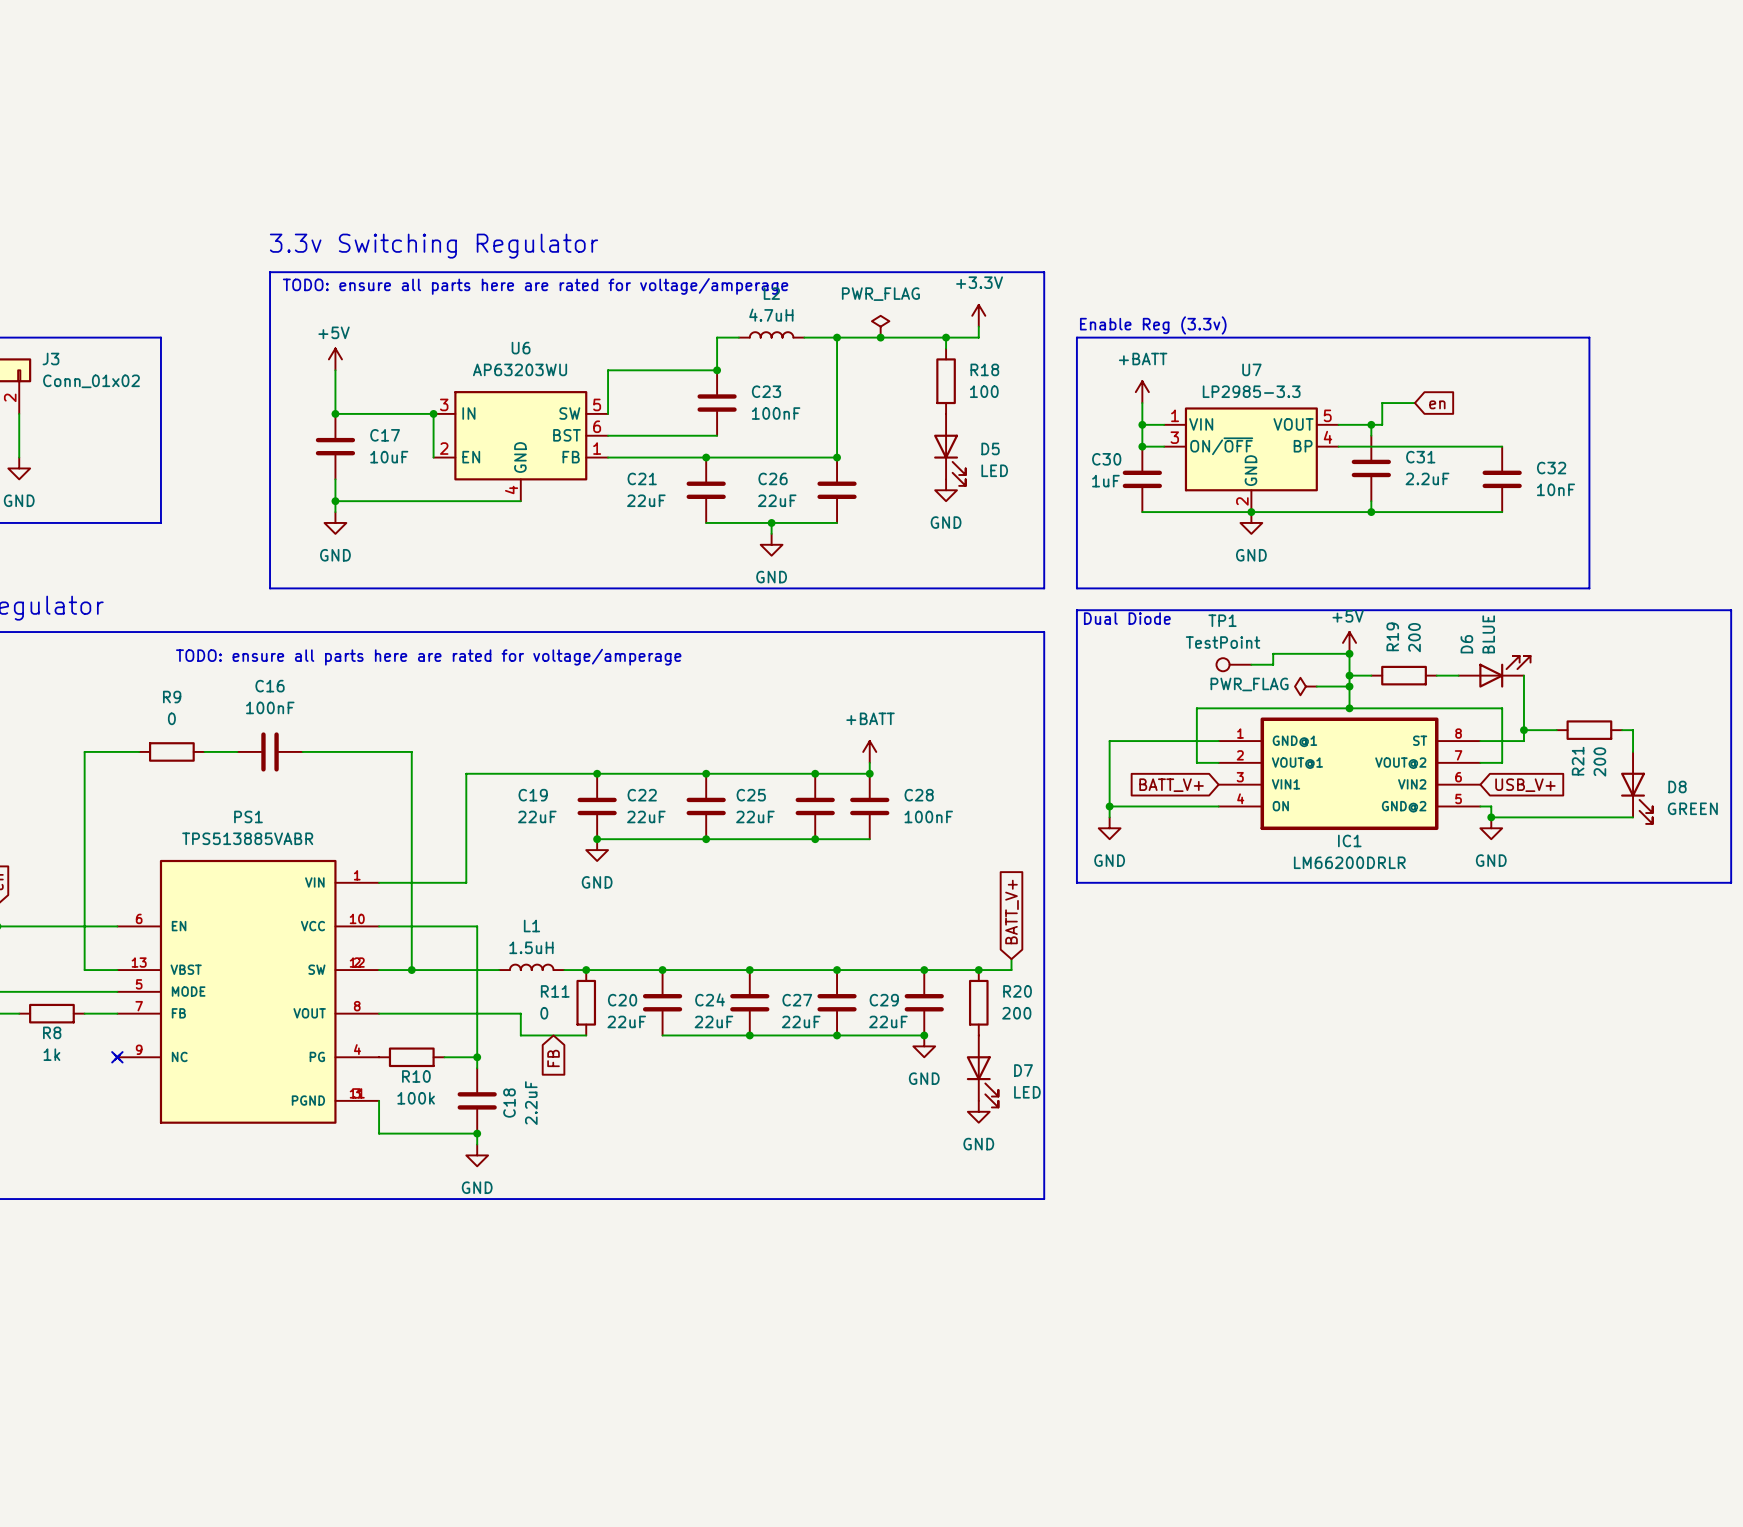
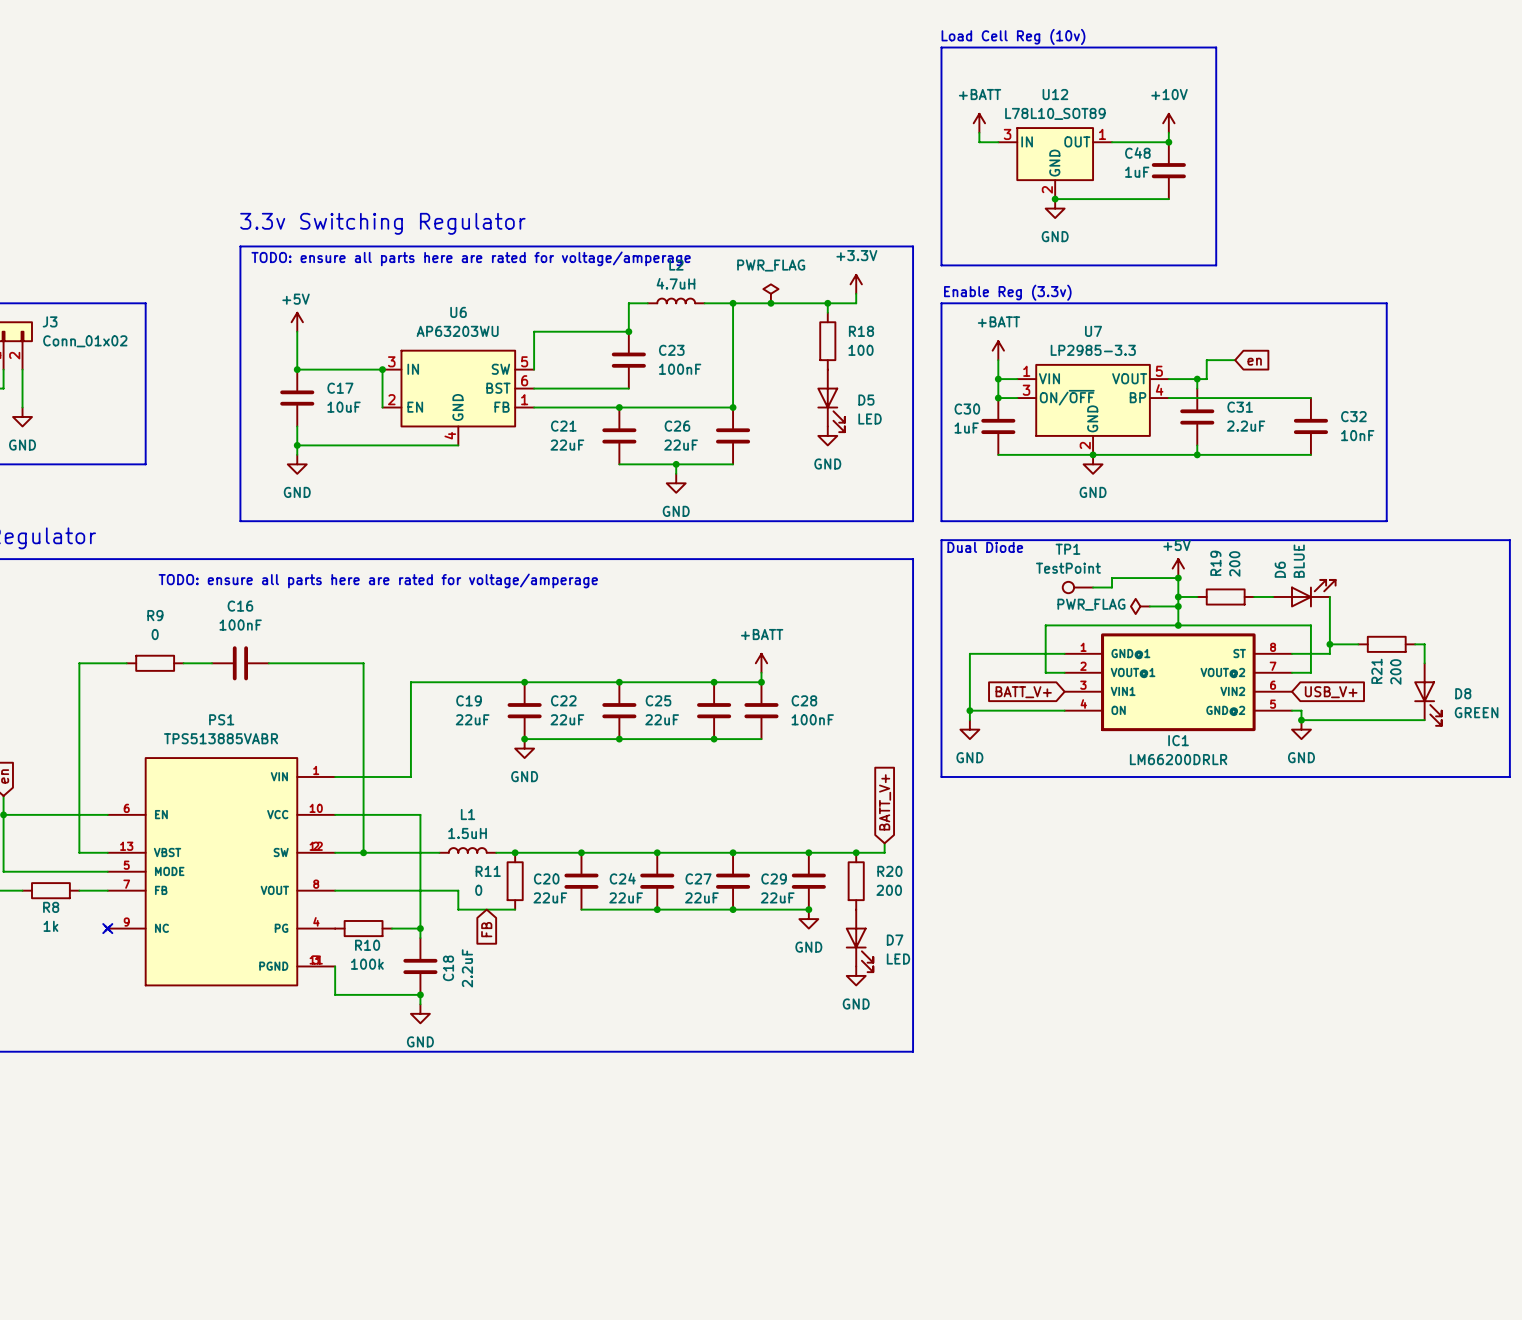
text: none -> Load Cell Reg (10v) (1013, 36)
line: none -> (941, 47) (1216, 47) (1216, 265) (941, 265) (941, 47)
power symbol: none -> +BATT (979, 123)
power symbol: none -> +10V (1168, 123)
wire: none -> (979, 132) (979, 142) (998, 142)
wire: none -> (1168, 132) (1168, 142) (1112, 142)
junction: none -> (1168, 142)
U12: none -> L78L10_SOT89 (1055, 163)
C48: none -> 1uF (1168, 170)
wire: none -> (1055, 199) (1168, 199)
junction: none -> (1055, 199)
power symbol: none -> GND (1055, 208)

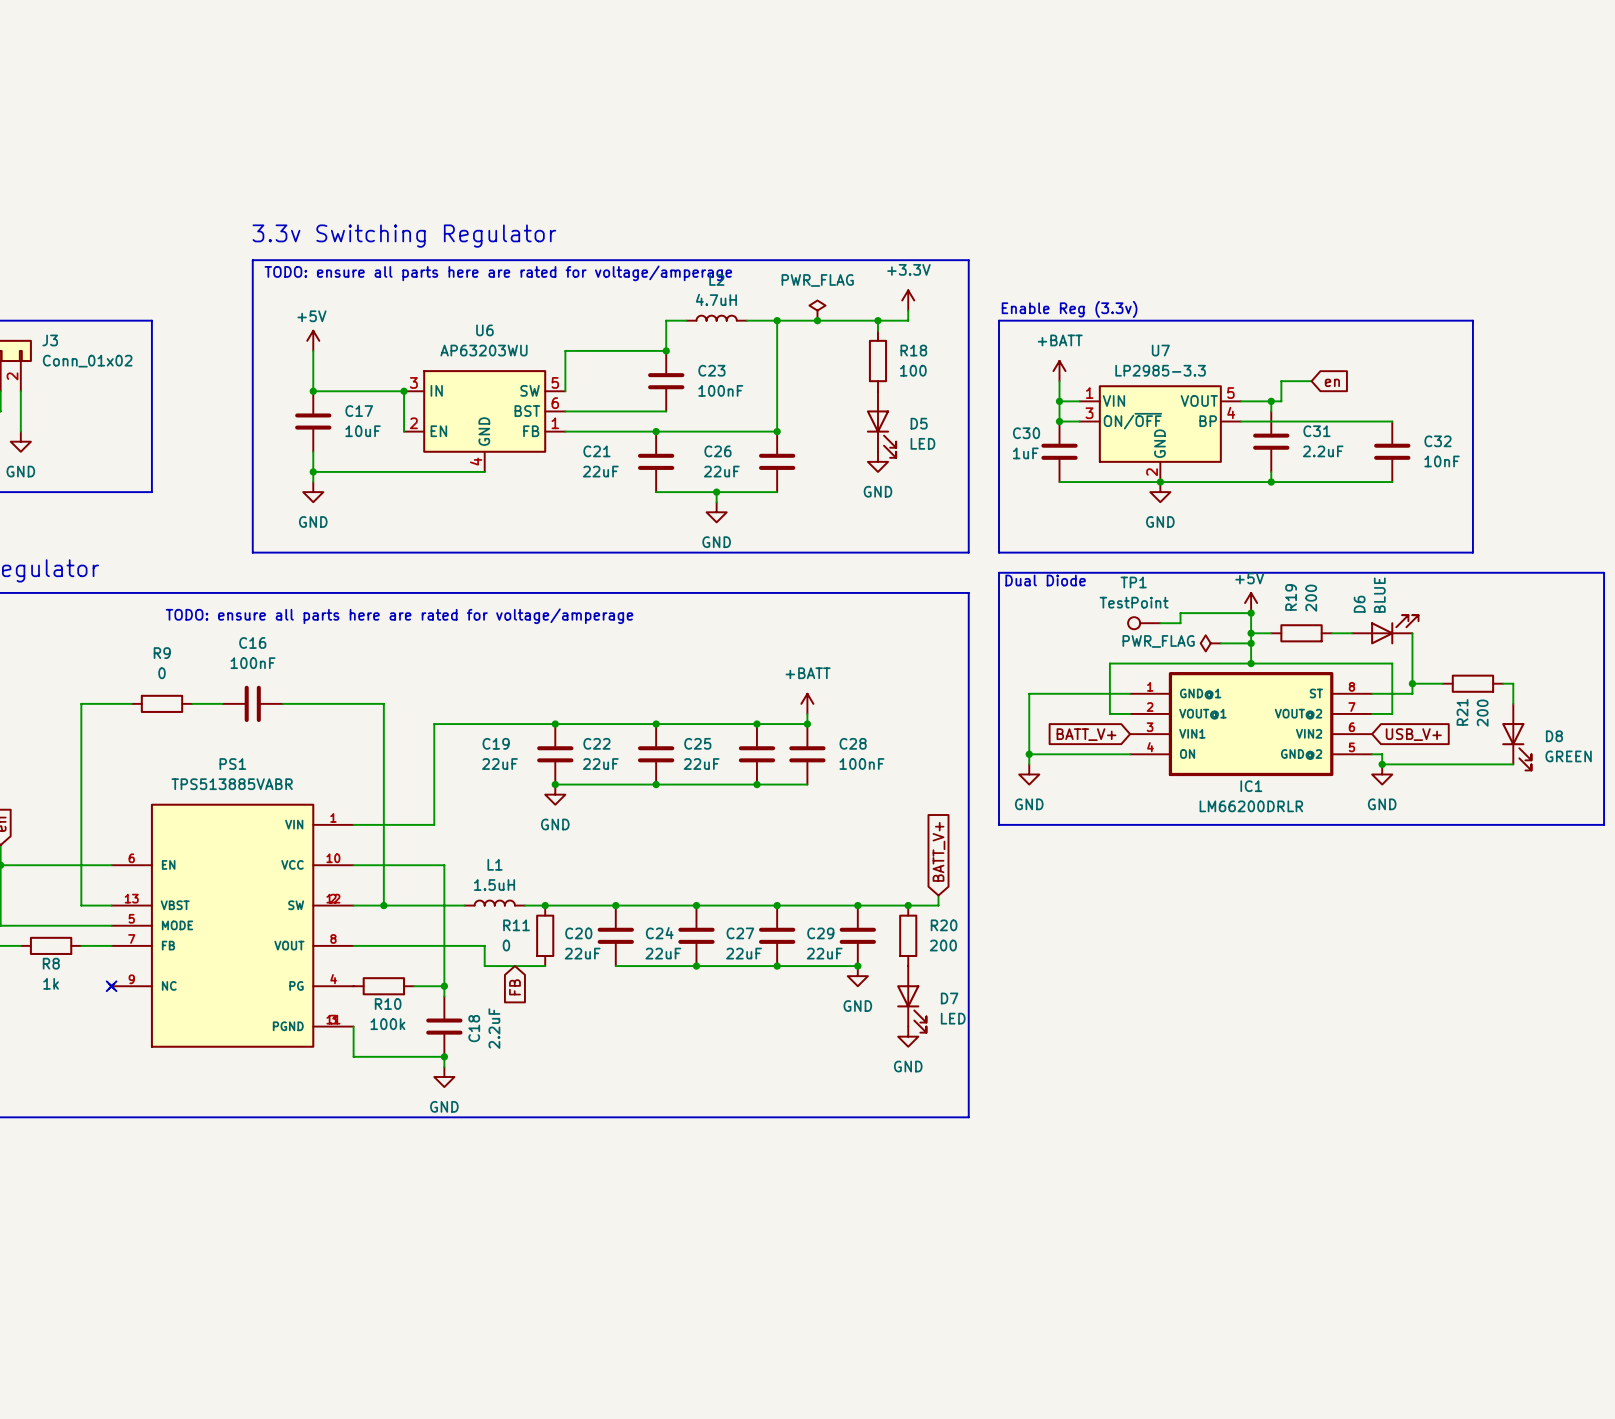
text: Load Cell Reg (10v) (1013, 36) -> none
line: (941, 47) (1216, 47) (1216, 265) (941, 265) (941, 47) -> none
power symbol: +BATT (979, 123) -> none
power symbol: +10V (1168, 123) -> none
wire: (979, 132) (979, 142) (998, 142) -> none
wire: (1168, 132) (1168, 142) (1112, 142) -> none
junction: (1168, 142) -> none
U12: L78L10_SOT89 (1055, 163) -> none
C48: 1uF (1168, 170) -> none
wire: (1055, 199) (1168, 199) -> none
junction: (1055, 199) -> none
power symbol: GND (1055, 208) -> none

